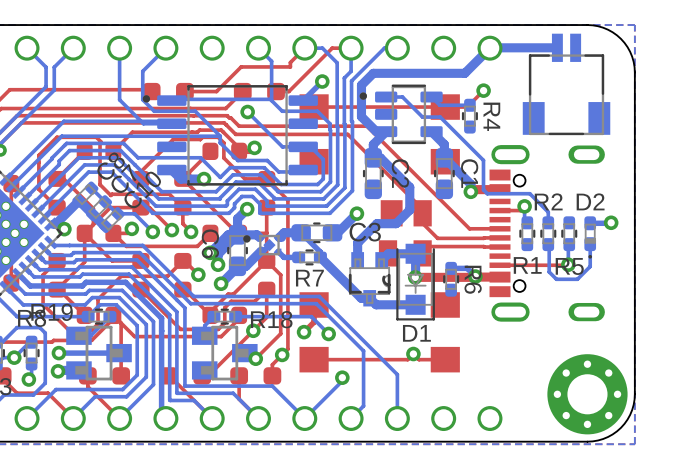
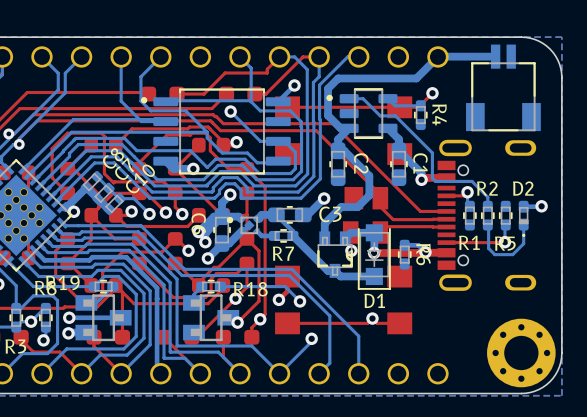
via: none -> (351, 250)

